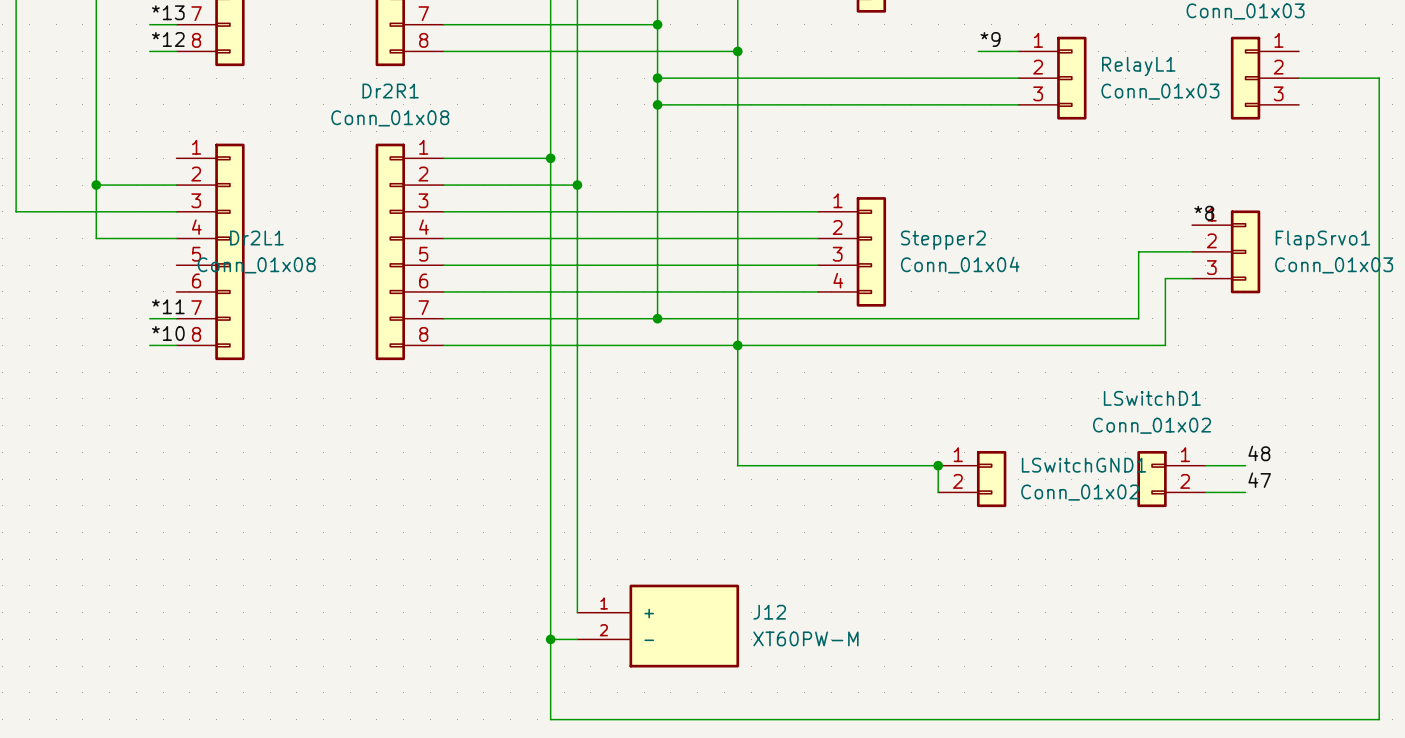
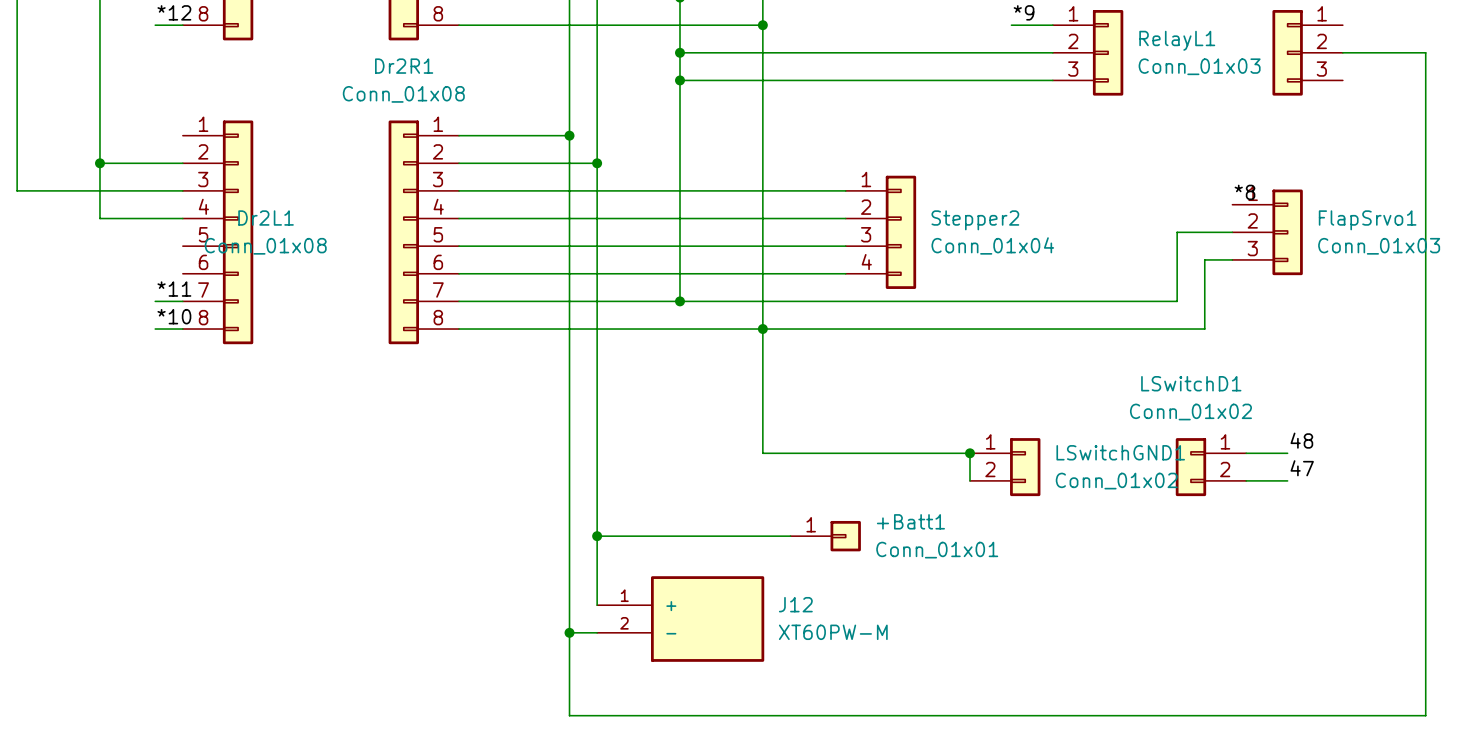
wire: none -> (597, 536) (790, 536)
junction: none -> (597, 536)
+Batt1: none -> Conn_01x01 (825, 536)

